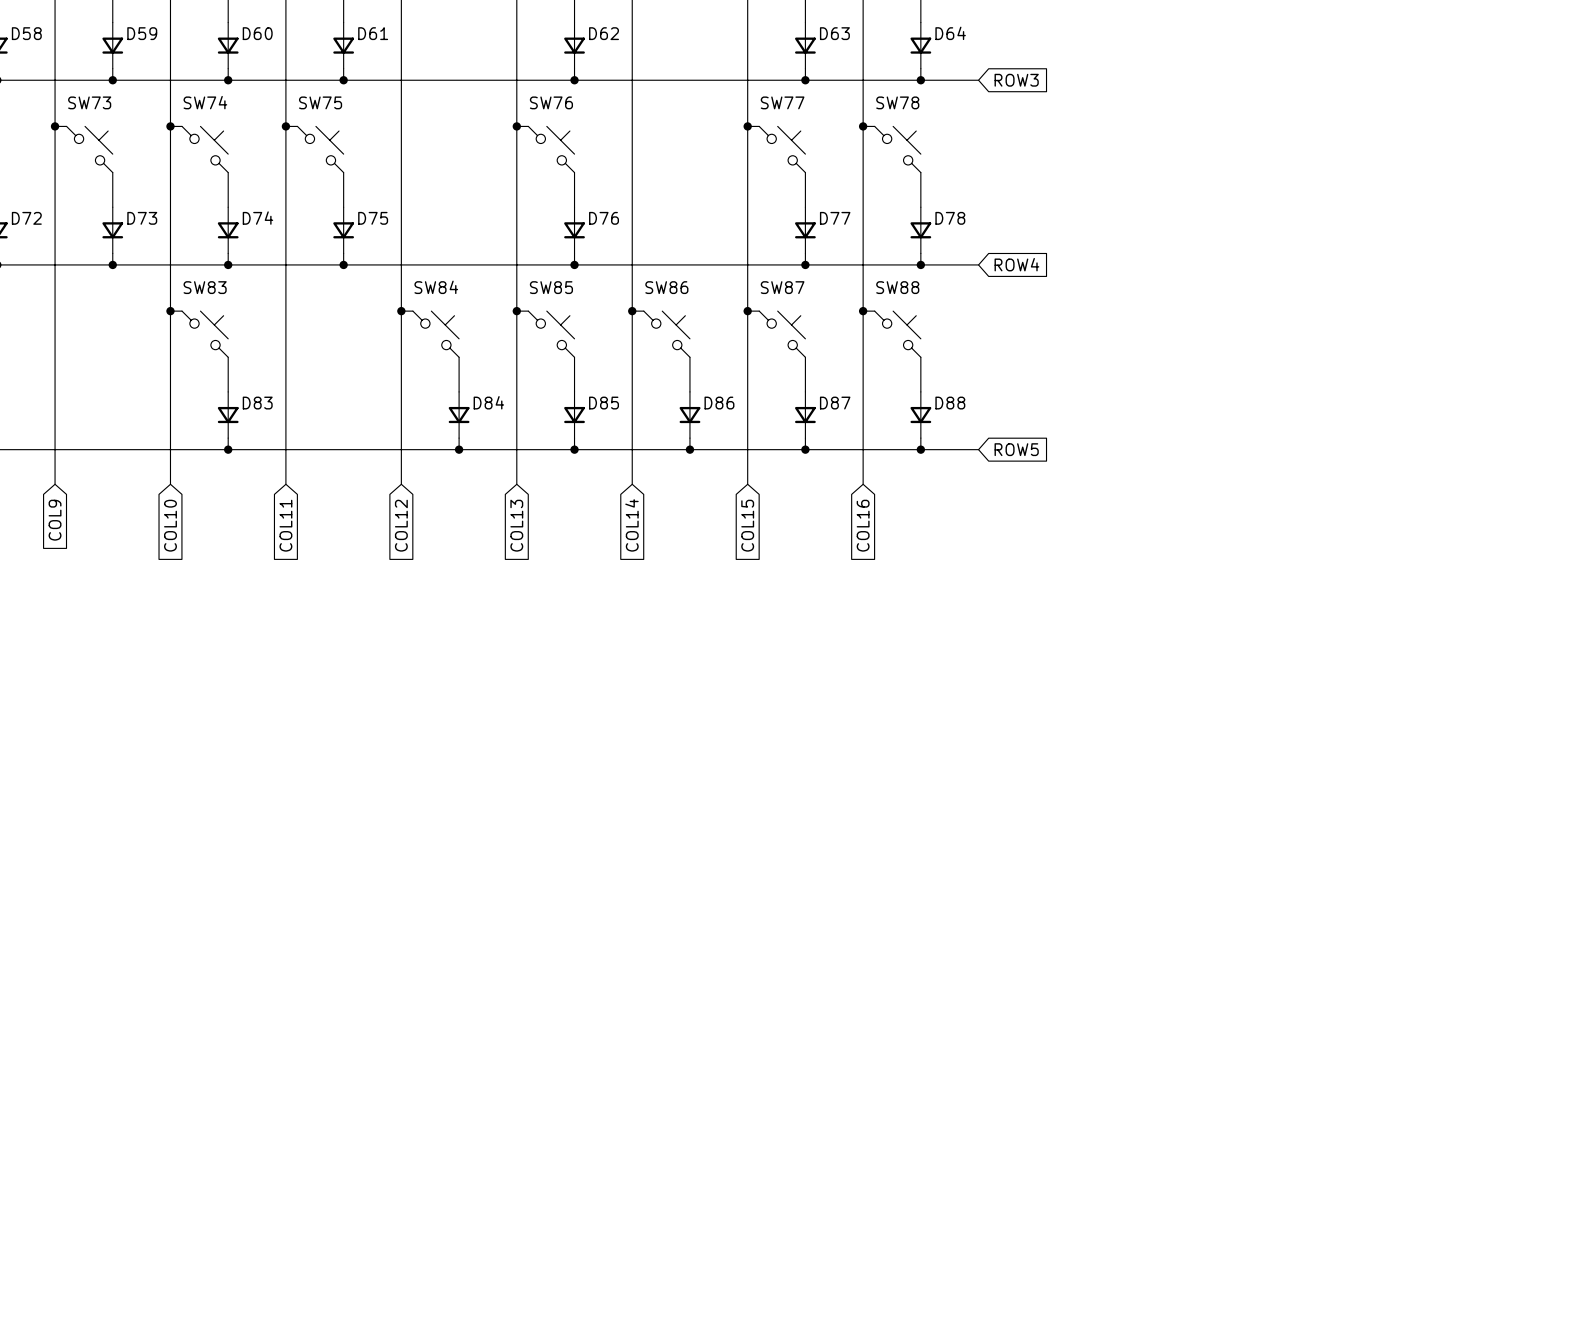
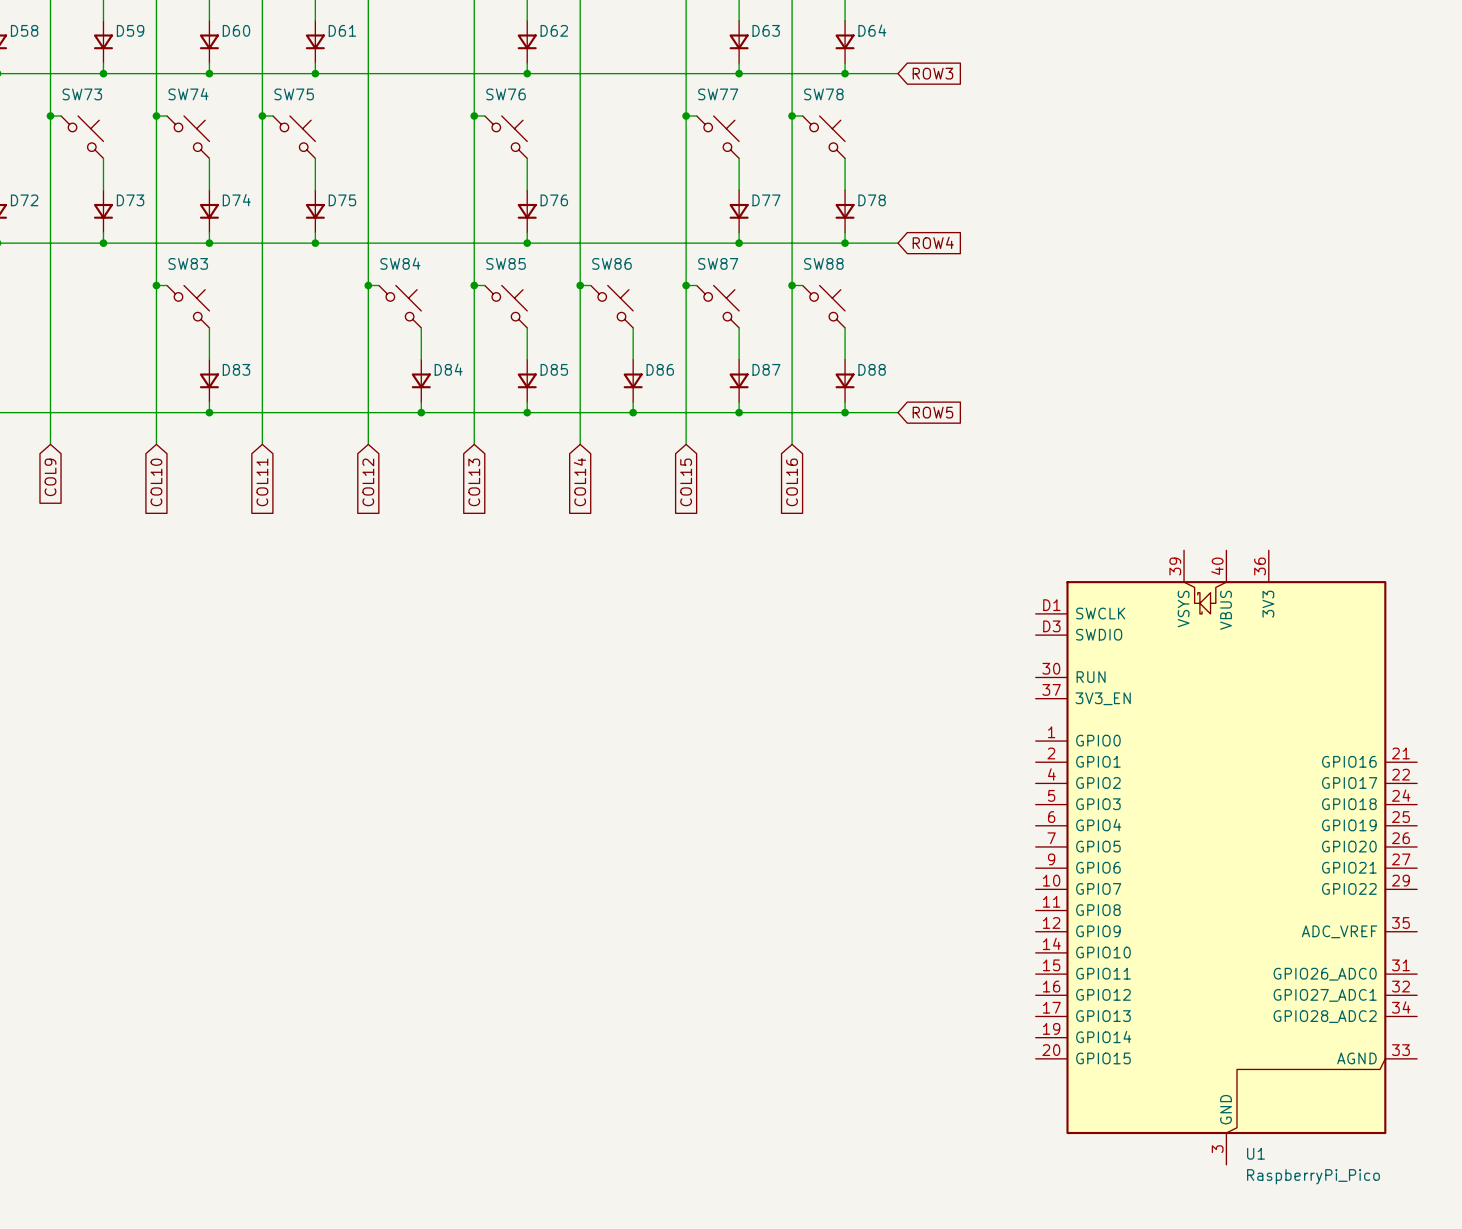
U1: none -> RaspberryPi_Pico (1226, 857)

